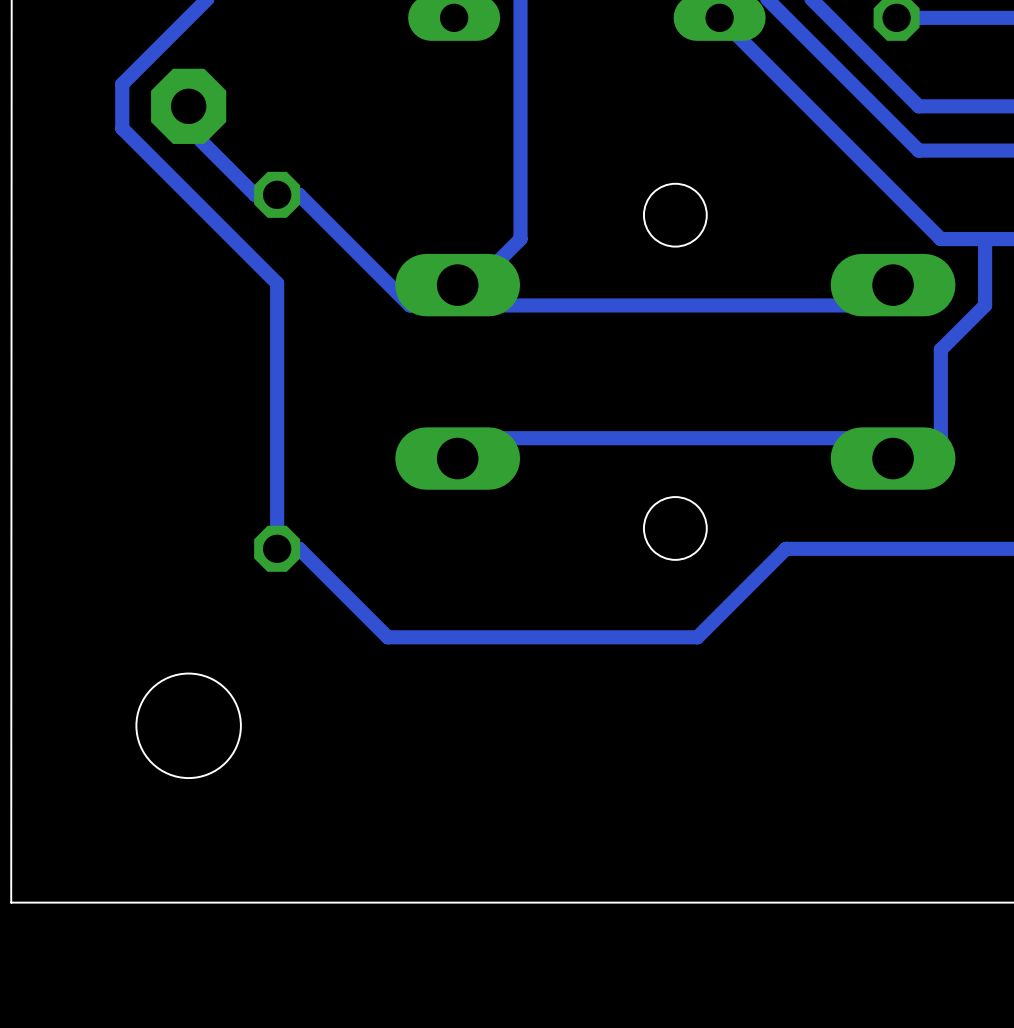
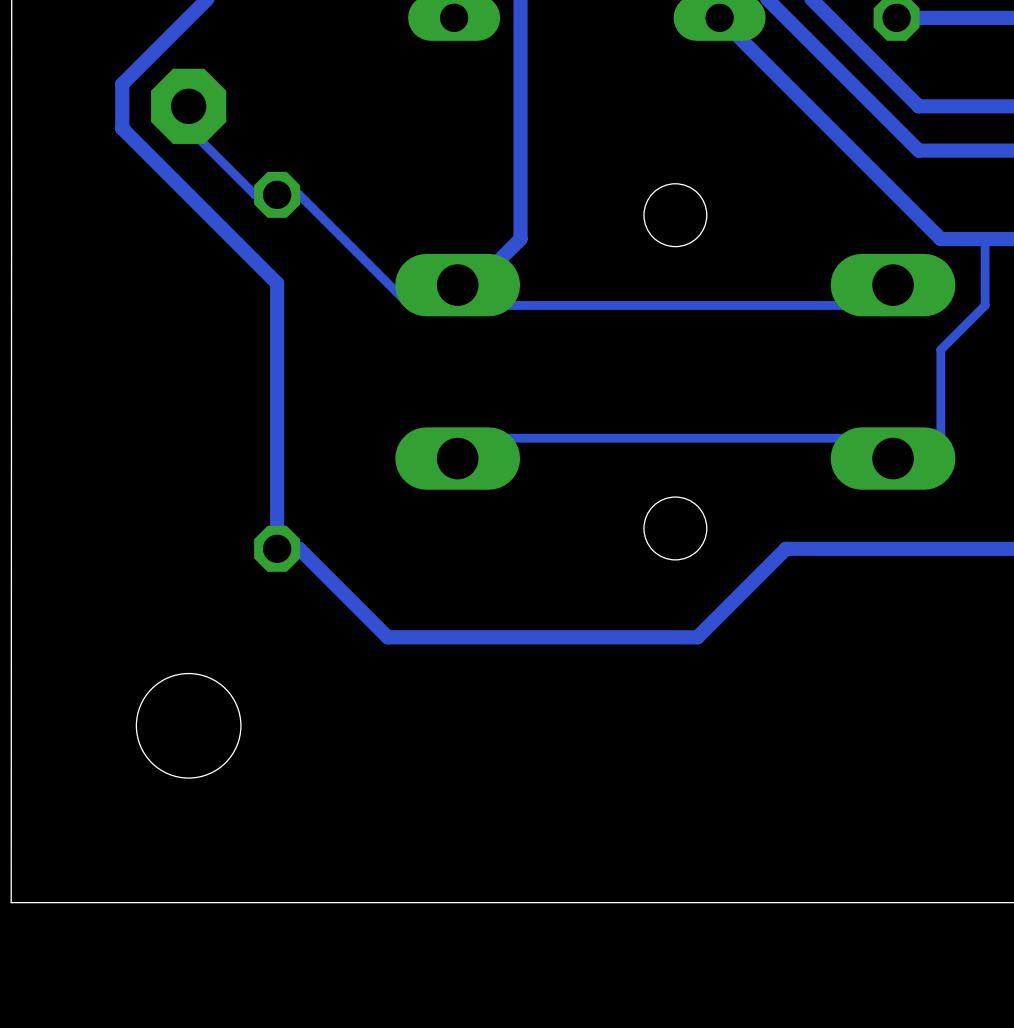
bottom track width: thick (188, 106) (188, 128) (255, 194) (299, 194) (409, 305) (457, 285) (498, 305) (852, 305) (893, 285) -> thin (188, 106) (188, 128) (255, 194) (299, 194) (409, 305) (457, 285) (498, 305) (852, 305) (893, 285)
bottom track width: thick (985, 239) (985, 305) (940, 349) (940, 438) (893, 458) (852, 438) (498, 438) (457, 458) -> thin (985, 239) (985, 305) (940, 349) (940, 438) (893, 458) (852, 438) (498, 438) (457, 458)

